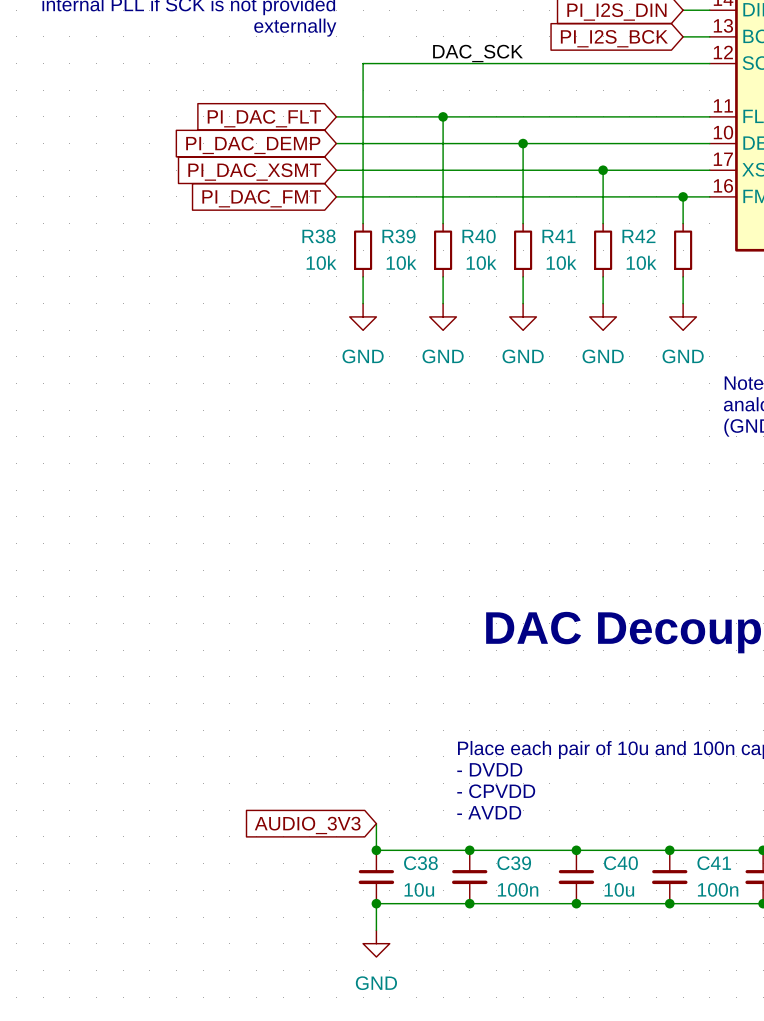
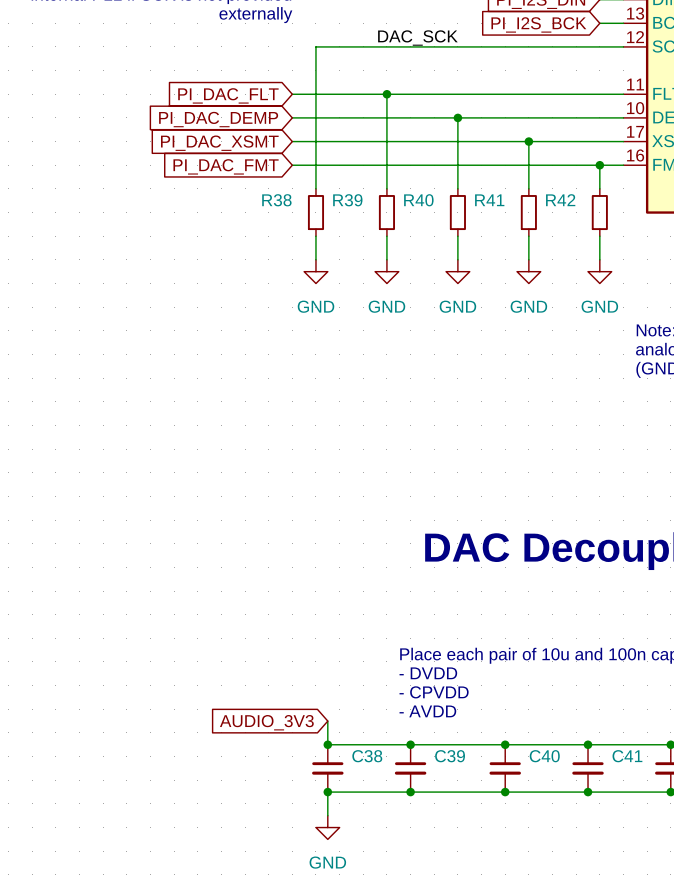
R38 value: 10k (321, 262) -> none
R39 value: 10k (401, 262) -> none
R40 value: 10k (481, 262) -> none
R41 value: 10k (561, 262) -> none
R42 value: 10k (641, 262) -> none
C38 value: 10u (419, 889) -> none
C39 value: 100n (518, 889) -> none
C40 value: 10u (619, 889) -> none
C41 value: 100n (718, 889) -> none

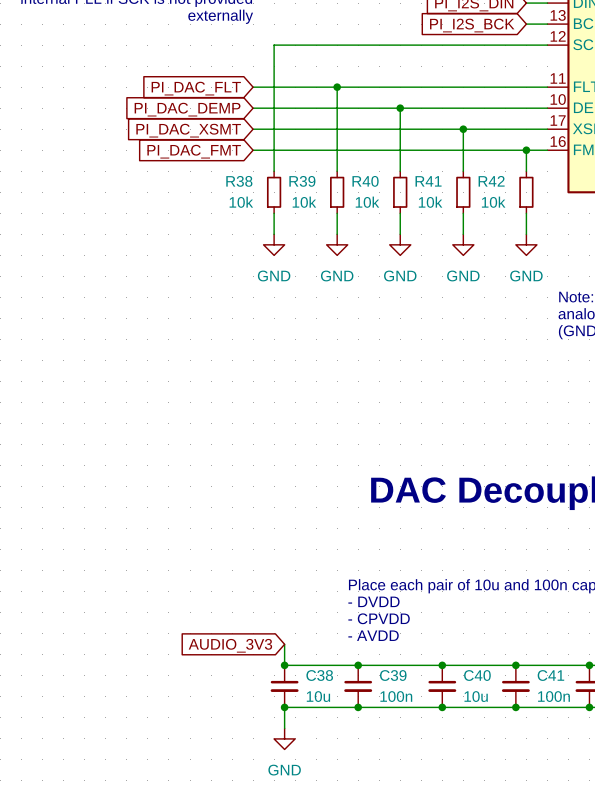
label: DAC_SCK (417, 38) -> none
R38 value: none -> 10k (241, 202)
R39 value: none -> 10k (304, 202)
R40 value: none -> 10k (367, 202)
R41 value: none -> 10k (430, 202)
R42 value: none -> 10k (493, 202)
C38 value: none -> 10u (318, 696)
C39 value: none -> 100n (396, 696)
C40 value: none -> 10u (476, 696)
C41 value: none -> 100n (554, 696)

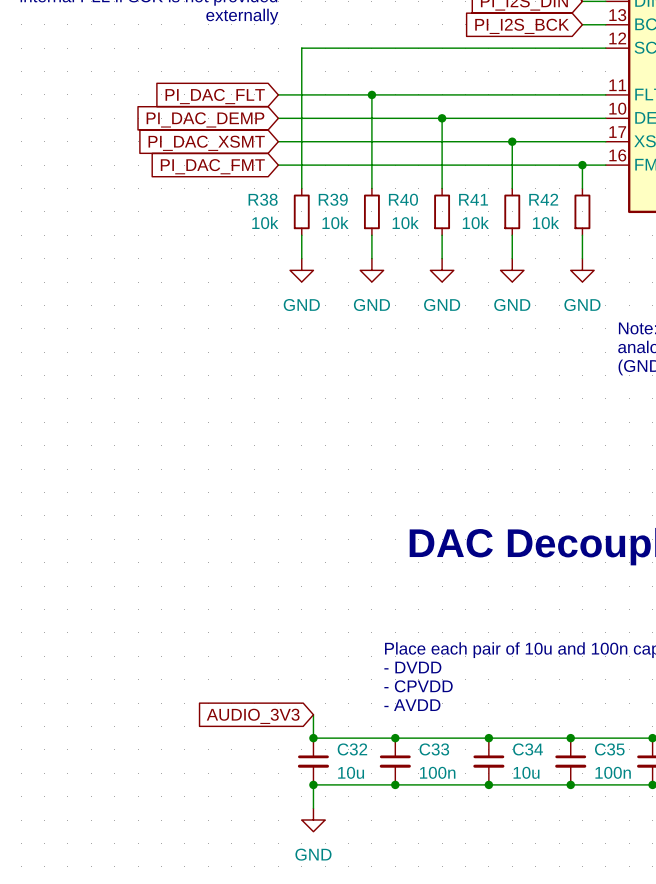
C38 name: C38 (319, 675) -> C32 (352, 749)
C39 name: C39 (393, 675) -> C33 (434, 749)
C40 name: C40 (477, 675) -> C34 (528, 749)
C41 name: C41 (550, 675) -> C35 (609, 749)

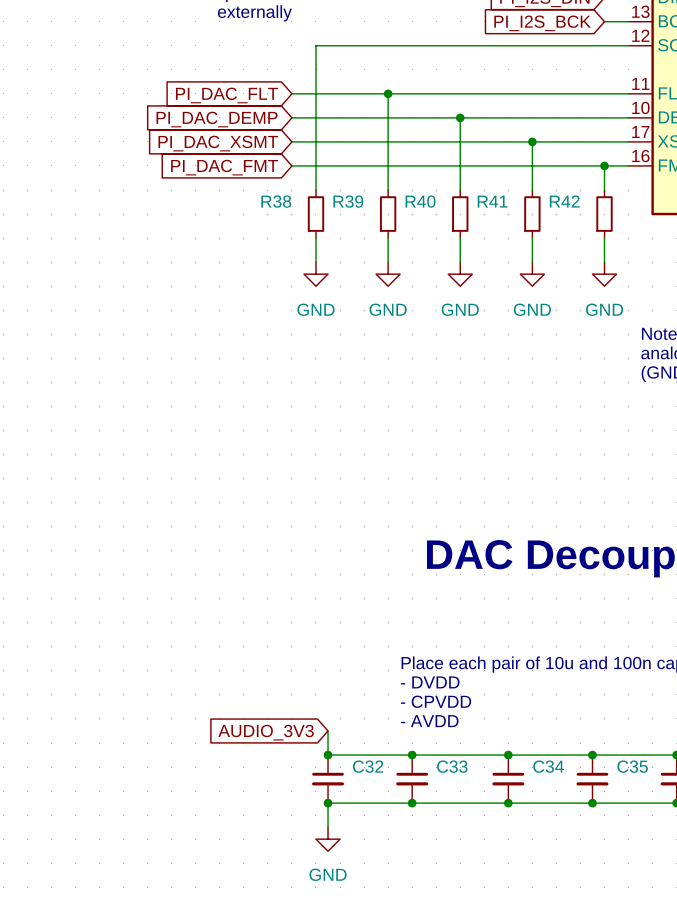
R38 value: 10k (265, 222) -> none
R39 value: 10k (335, 222) -> none
R40 value: 10k (405, 222) -> none
R41 value: 10k (475, 222) -> none
R42 value: 10k (545, 222) -> none
C32 value: 10u (351, 772) -> none
C33 value: 100n (437, 772) -> none
C34 value: 10u (526, 772) -> none
C35 value: 100n (613, 772) -> none

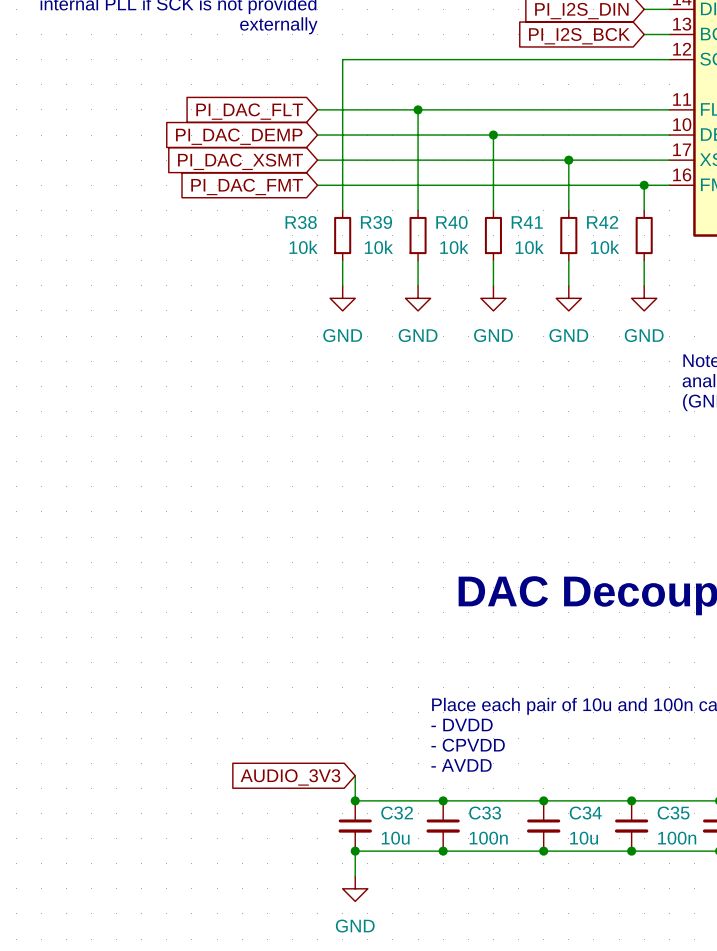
R38 value: none -> 10k (303, 247)
R39 value: none -> 10k (378, 247)
R40 value: none -> 10k (454, 247)
R41 value: none -> 10k (529, 247)
R42 value: none -> 10k (605, 247)
C32 value: none -> 10u (395, 838)
C33 value: none -> 100n (488, 838)
C34 value: none -> 10u (584, 838)
C35 value: none -> 100n (677, 838)

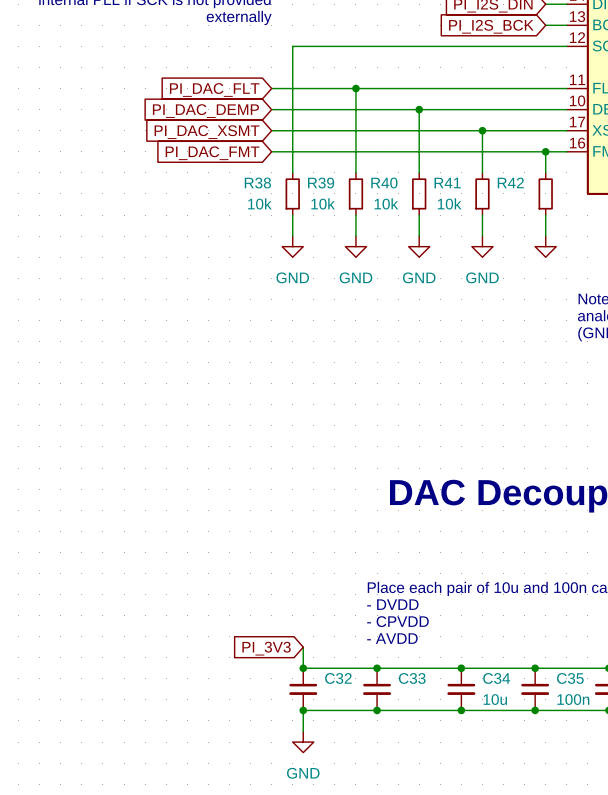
R42 value: 10k (605, 247) -> none
power symbol text: GND (644, 335) -> none
global label: AUDIO_3V3 (290, 777) -> PI_3V3 (266, 648)
C32 value: 10u (395, 838) -> none
C33 value: 100n (488, 838) -> none

